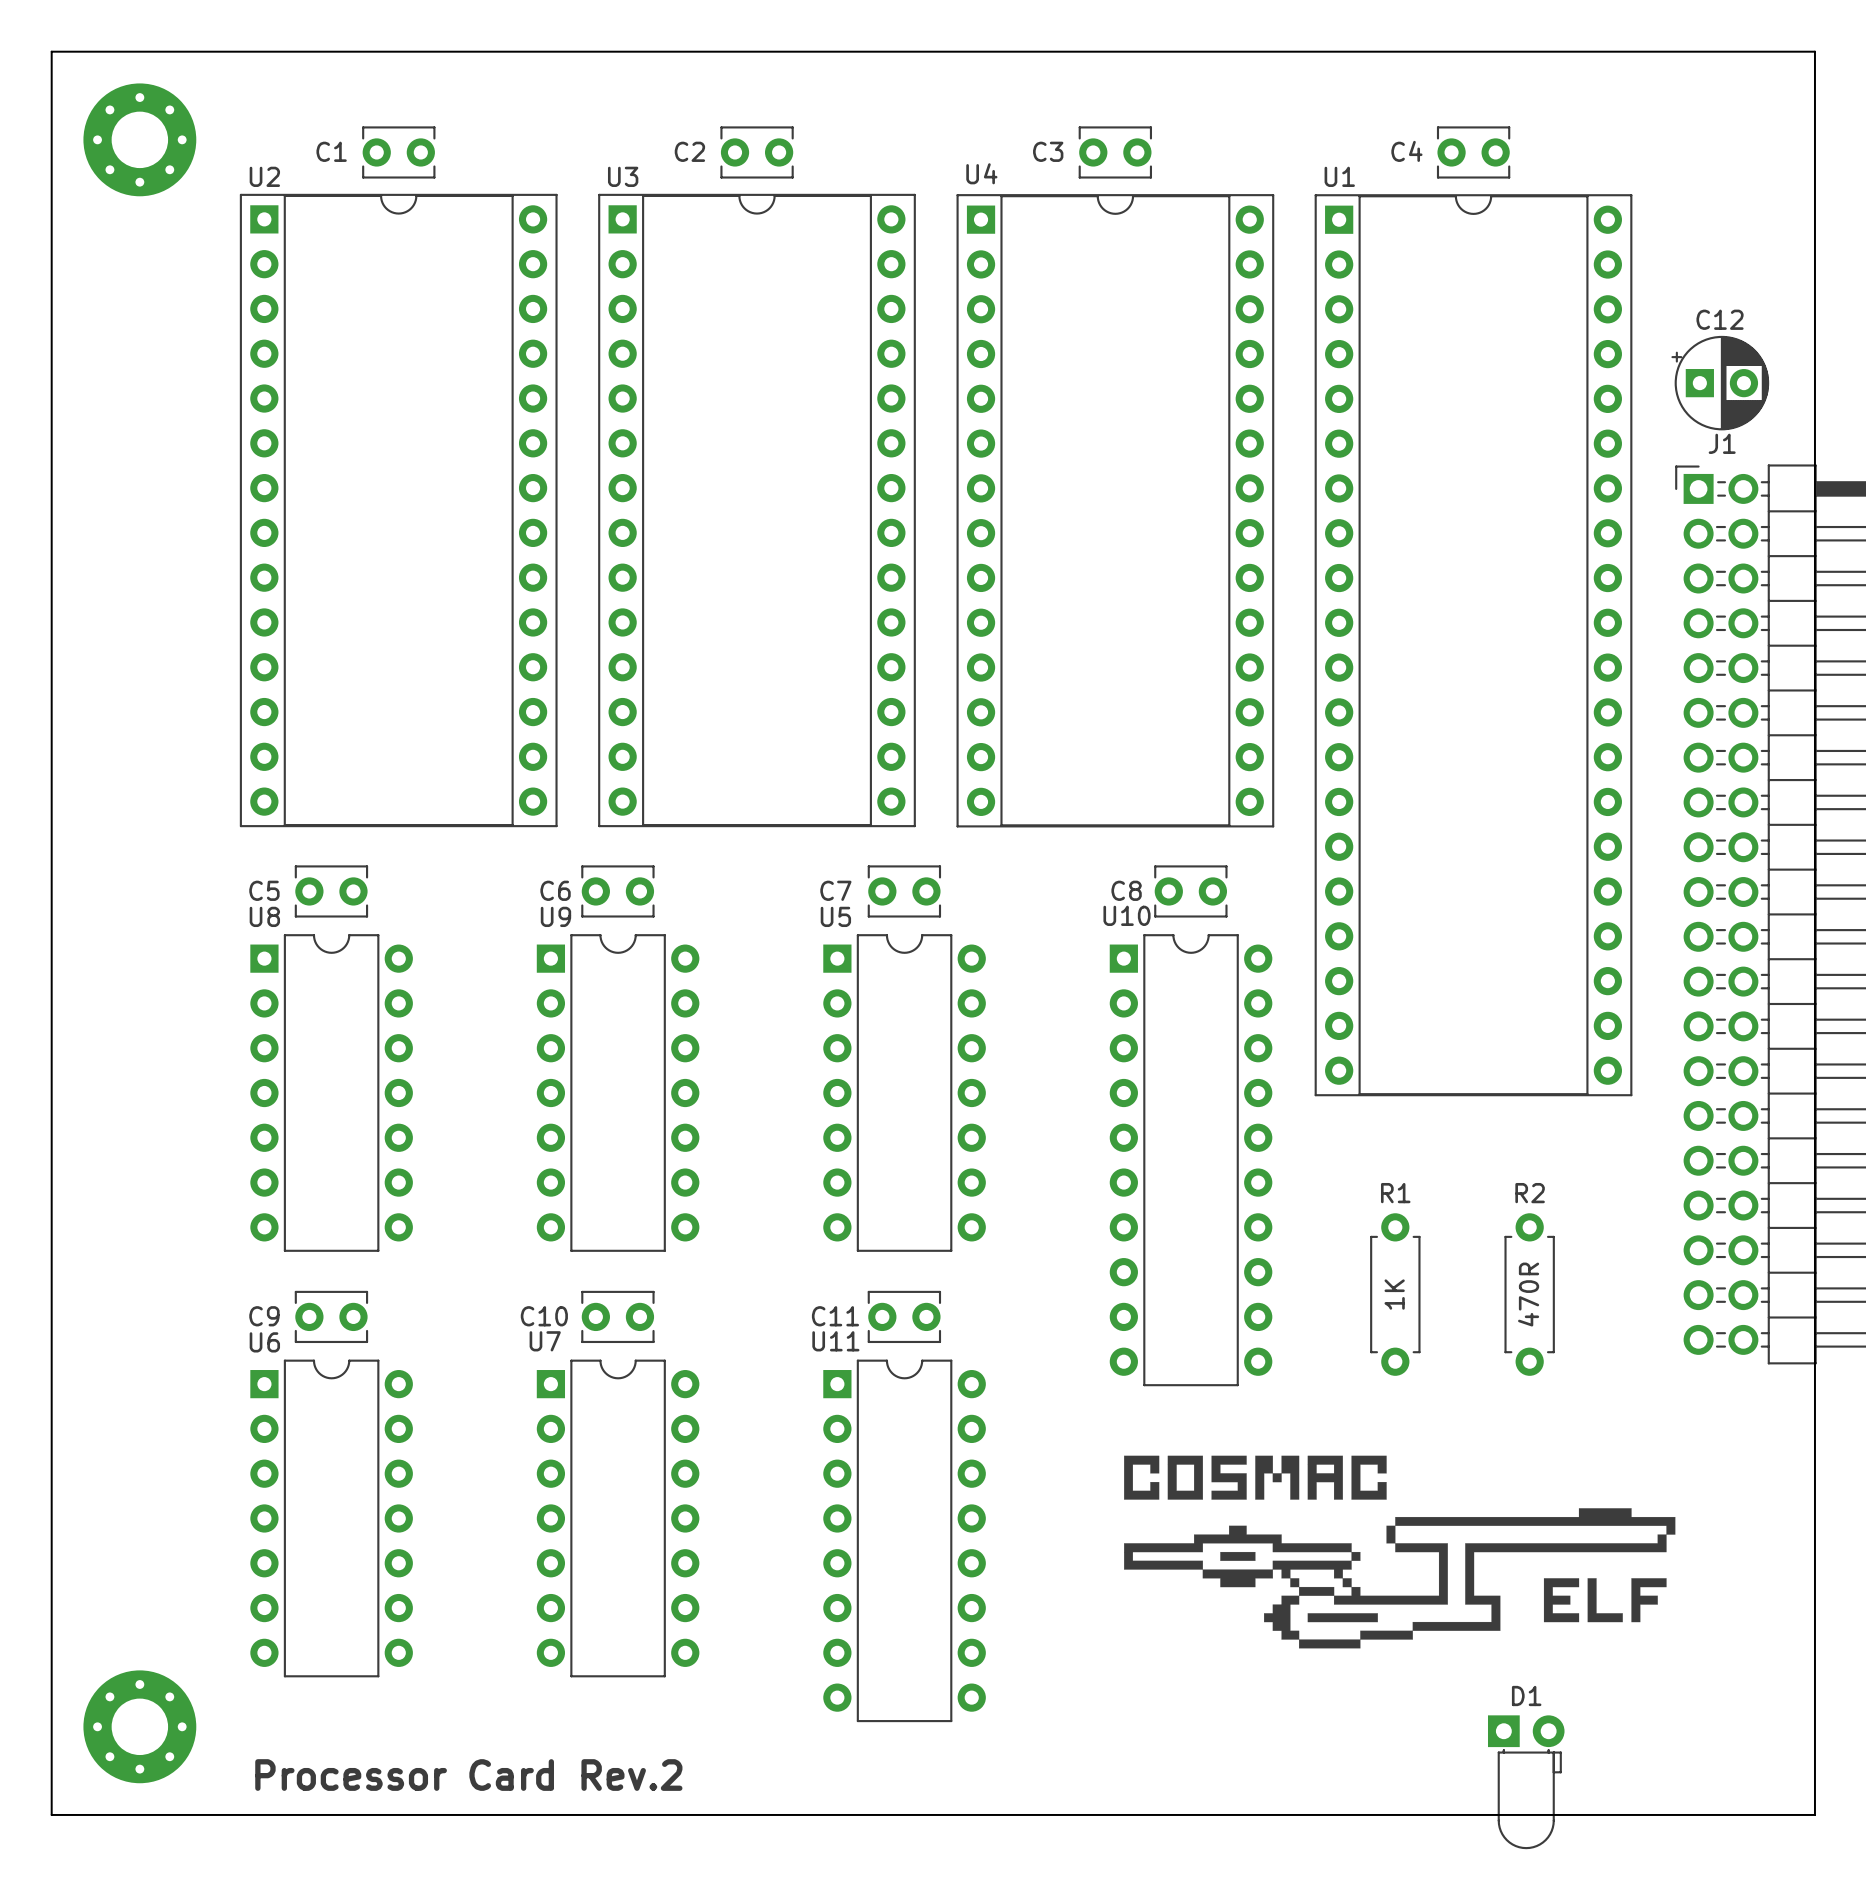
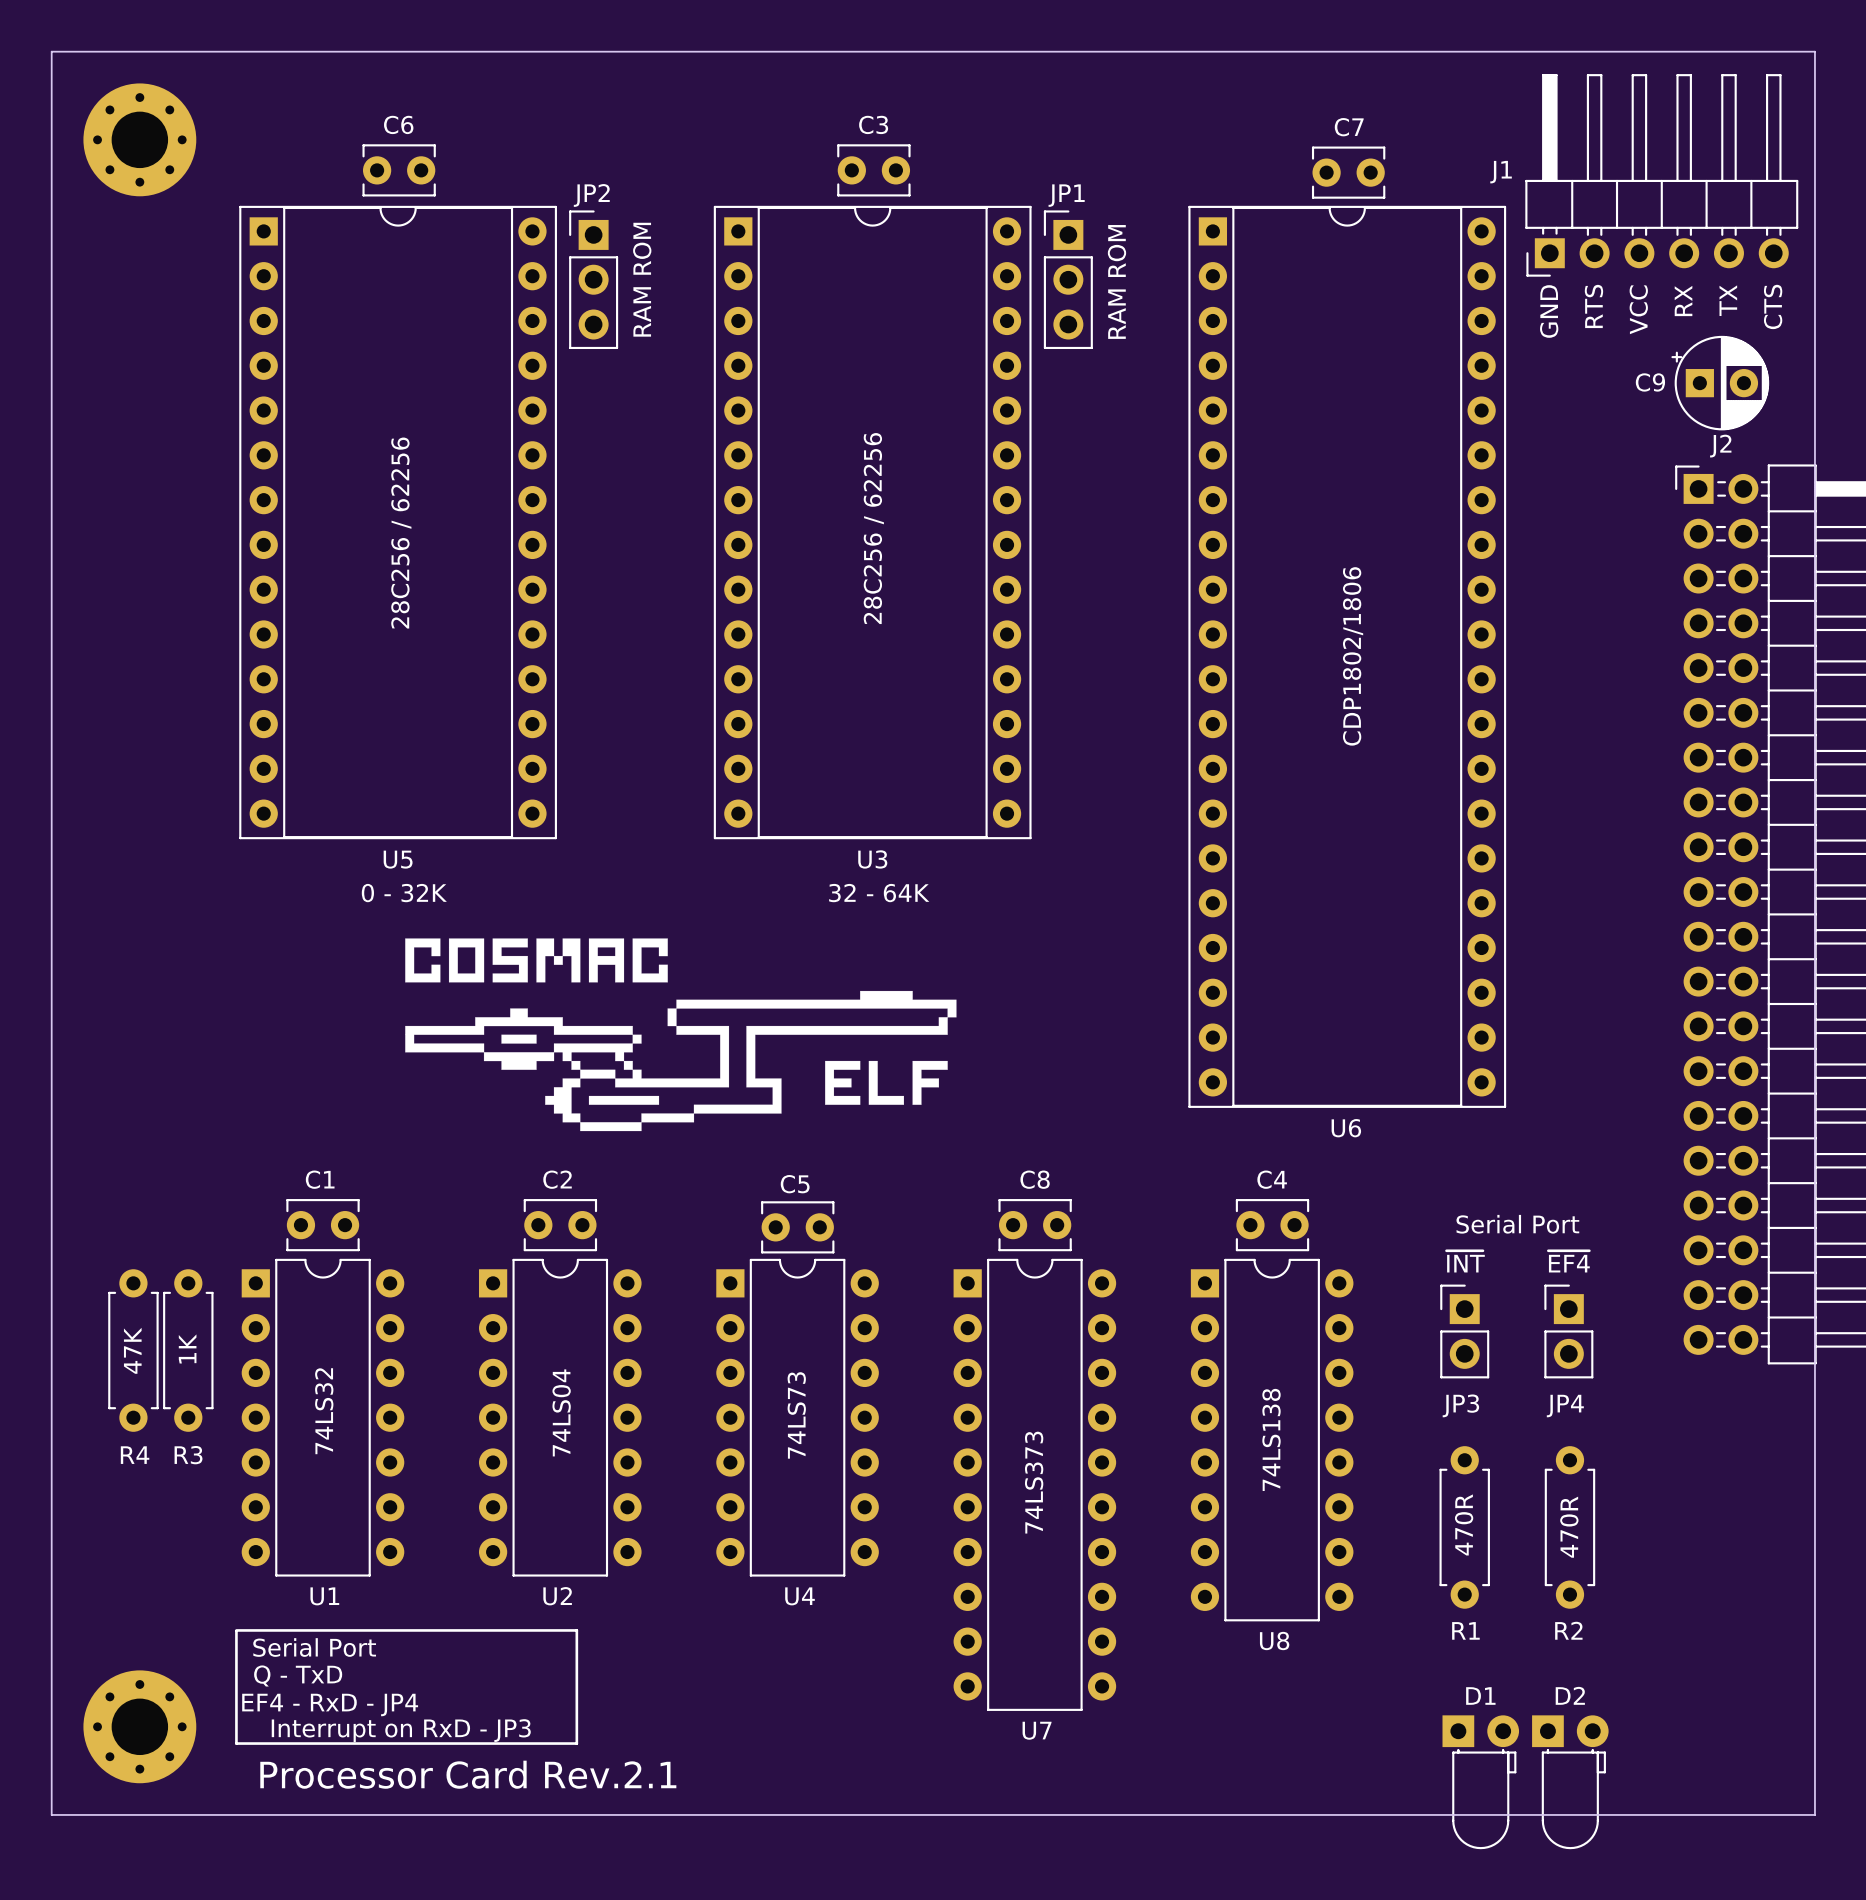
C1 name position: C1 (331, 151) -> C1 (320, 1179)
C2 name position: C2 (689, 151) -> C2 (557, 1179)
C3 name position: C3 (1048, 151) -> C3 (873, 124)
C4 name position: C4 (1406, 151) -> C4 (1272, 1179)
C1 position: (398, 152) -> (323, 1225)
C2 position: (757, 152) -> (560, 1225)
C3 position: (1115, 152) -> (873, 170)
C4 position: (1473, 152) -> (1272, 1225)
U4 name position: U4 (981, 173) -> U4 (800, 1596)
J1: none -> (1661, 175)
U2 name position: U2 (264, 176) -> U2 (557, 1596)
U3 name position: U3 (623, 176) -> U3 (872, 859)
U1 name position: U1 (1339, 176) -> U1 (324, 1596)
U2 footprint: [239, 193, 558, 828] -> [478, 1258, 642, 1577]
U4 footprint: [956, 194, 1275, 828] -> [716, 1258, 879, 1577]
U1 footprint: [1314, 194, 1633, 1097] -> [241, 1258, 405, 1577]
JP2: none -> RAM ROM (593, 279)
JP1: none -> RAM ROM (1068, 279)
text: none -> RX (1683, 300)
text: none -> TX (1728, 300)
text: none -> RTS (1593, 306)
text: none -> CTS (1773, 306)
text: none -> VCC (1638, 309)
text: none -> GND (1549, 311)
C12 name: C12 (1720, 319) -> C9 (1650, 382)
J1 name: J1 (1722, 443) -> J2 (1720, 446)
U3 position: (757, 510) -> (872, 522)
U3 value: none -> 28C256 / 62256 (873, 528)
U5 value: none -> 28C256 / 62256 (401, 533)
U6 value: none -> CDP1802/1806 (1353, 656)
C5 name position: C5 (264, 890) -> C5 (795, 1184)
C6 name position: C6 (555, 890) -> C6 (398, 124)
C7 name position: C7 (835, 890) -> C7 (1349, 127)
C8 name position: C8 (1126, 890) -> C8 (1035, 1179)
C5 position: (331, 891) -> (797, 1227)
C6 position: (617, 891) -> (399, 170)
C7 position: (904, 891) -> (1348, 172)
C8 position: (1190, 891) -> (1035, 1225)
text: none -> 32 - 64K (879, 893)
text: none -> 0 - 32K (404, 893)
U8 name position: U8 (264, 916) -> U8 (1274, 1641)
U5 name position: U5 (835, 916) -> U5 (398, 859)
U8 footprint: [250, 934, 413, 1252] -> [1190, 1258, 1354, 1622]
U5 footprint: [823, 934, 986, 1252] -> [239, 205, 557, 840]
drawing: none -> [405, 938, 957, 1132]
U9: (618, 1093) -> none
U10: (1191, 1160) -> none
R1 name position: R1 (1395, 1193) -> R1 (1465, 1630)
R2 name position: R2 (1530, 1193) -> R2 (1568, 1630)
text: none -> Serial Port (1517, 1224)
R1 value: 1K (1394, 1294) -> 470R (1464, 1524)
R1 position: (1395, 1294) -> (1464, 1527)
R2 position: (1529, 1294) -> (1569, 1527)
C9: (331, 1316) -> none
C10: (617, 1316) -> none
C11: (904, 1316) -> none
JP3: none -> ~{INT} (1464, 1331)
JP4: none -> ~{EF4} (1568, 1331)
U7 name position: U7 (545, 1341) -> U7 (1037, 1730)
U6 name position: U6 (264, 1342) -> U6 (1346, 1128)
R4: none -> 47K (133, 1350)
R3: none -> 1K (188, 1350)
U6 footprint: [250, 1359, 413, 1678] -> [1188, 205, 1507, 1108]
U7 footprint: [536, 1359, 700, 1678] -> [953, 1258, 1117, 1711]
U1 value: none -> 74LS32 (324, 1411)
U2 value: none -> 74LS04 (561, 1412)
U4 value: none -> 74LS73 (796, 1415)
U8 value: none -> 74LS138 (1271, 1439)
drawing: [1124, 1455, 1676, 1649] -> none
U7 value: none -> 74LS373 (1034, 1482)
U11: (904, 1540) -> none
line: none -> (236, 1630) (576, 1630) (576, 1743) (236, 1743) (236, 1631)
text: none -> Serial Port (314, 1647)
text: none -> Q - TxD (298, 1675)
text: none -> EF4 - RxD - JP4 (330, 1704)
text: none -> Interrupt on RxD - JP3 (401, 1730)
text: Processor Card Rev.2 (468, 1775) -> Processor Card Rev.2.1 (468, 1774)
D1 position: (1526, 1782) -> (1480, 1782)
D2: none -> (1570, 1782)

